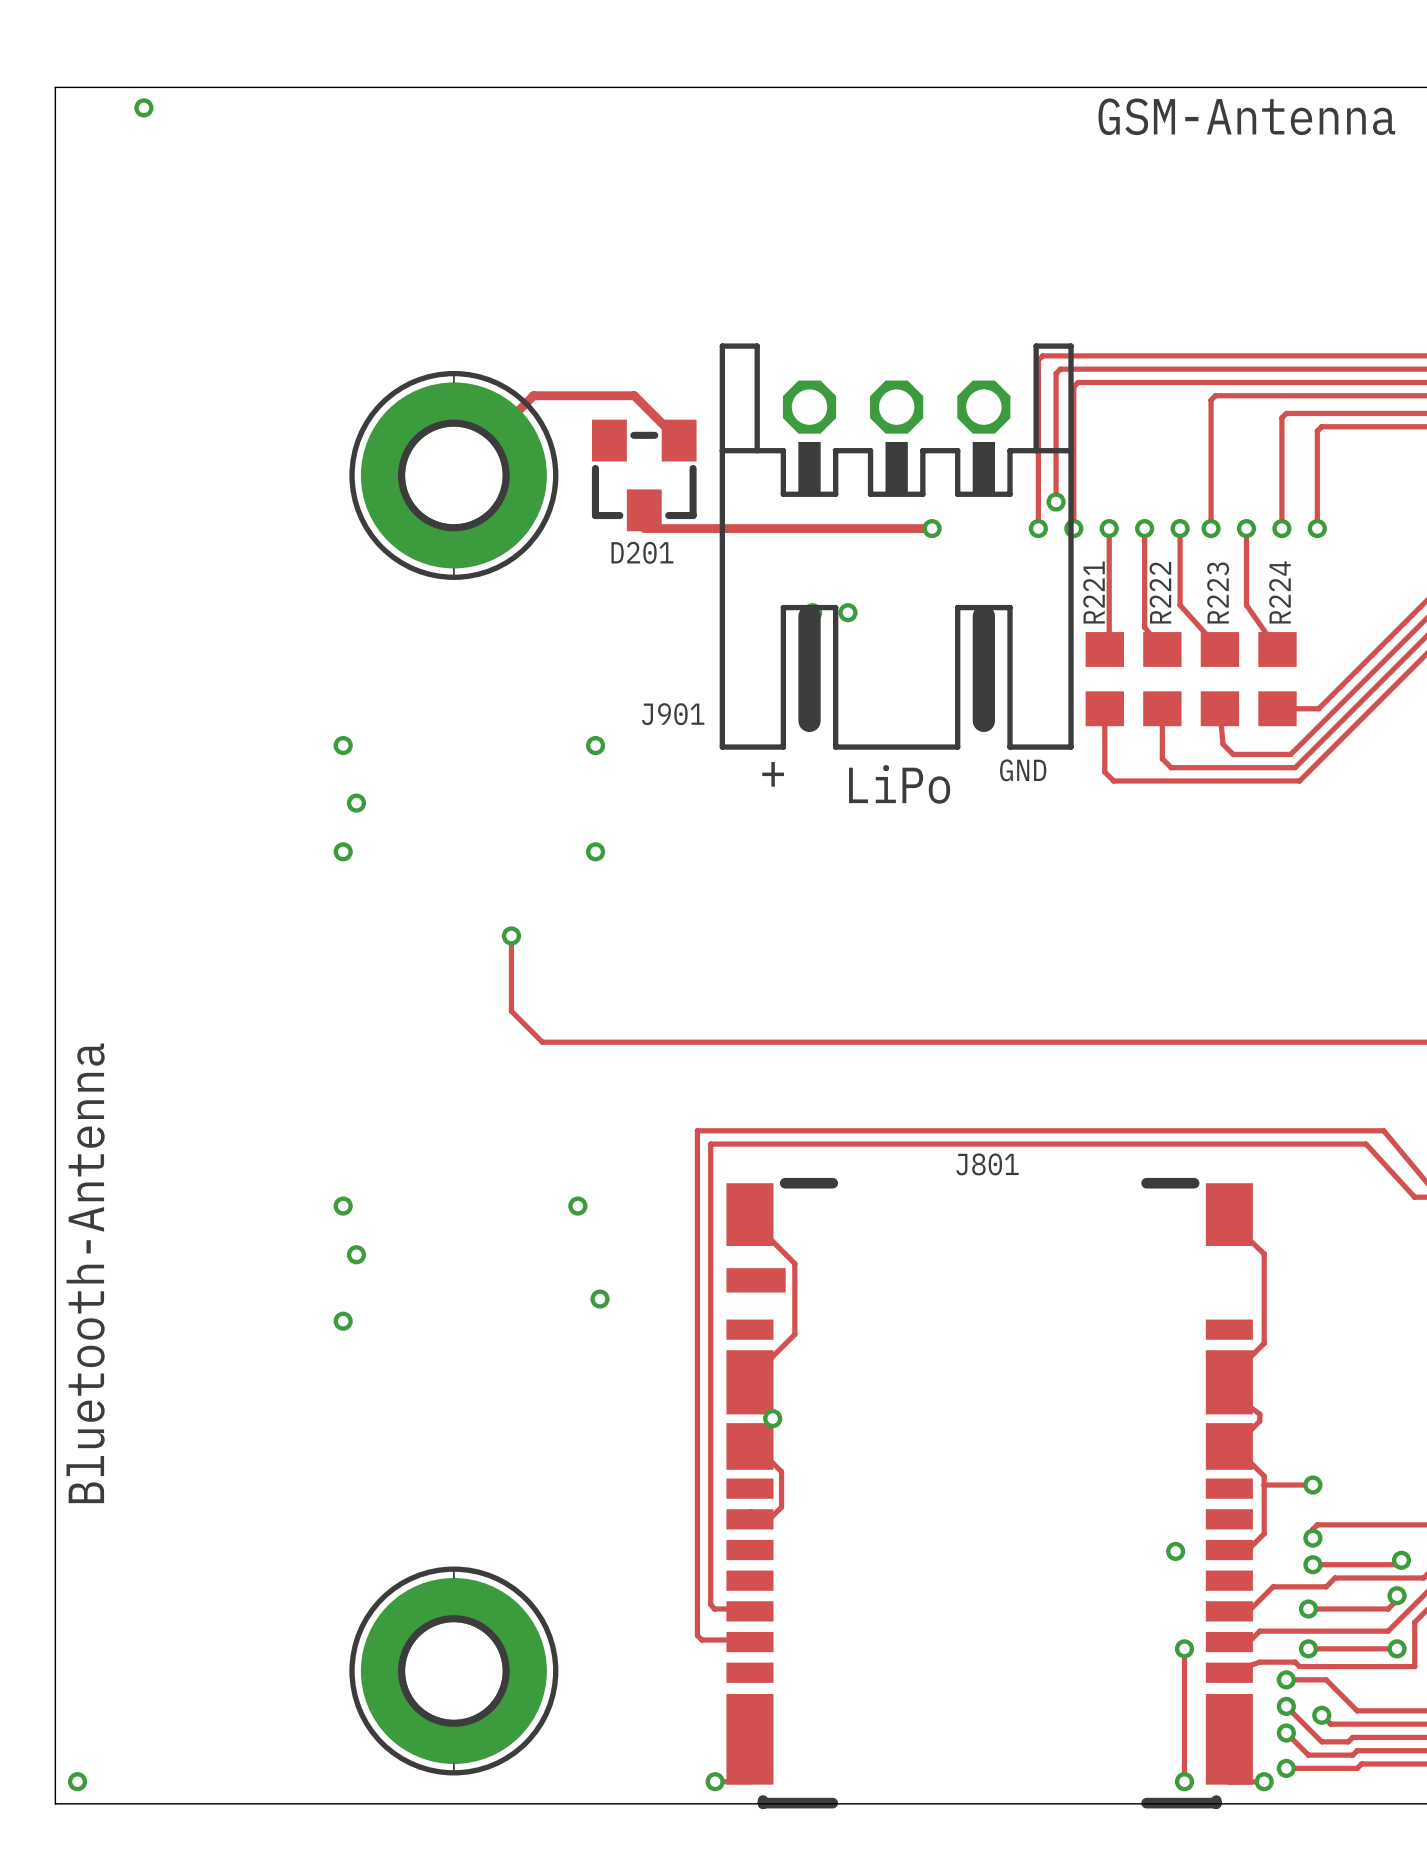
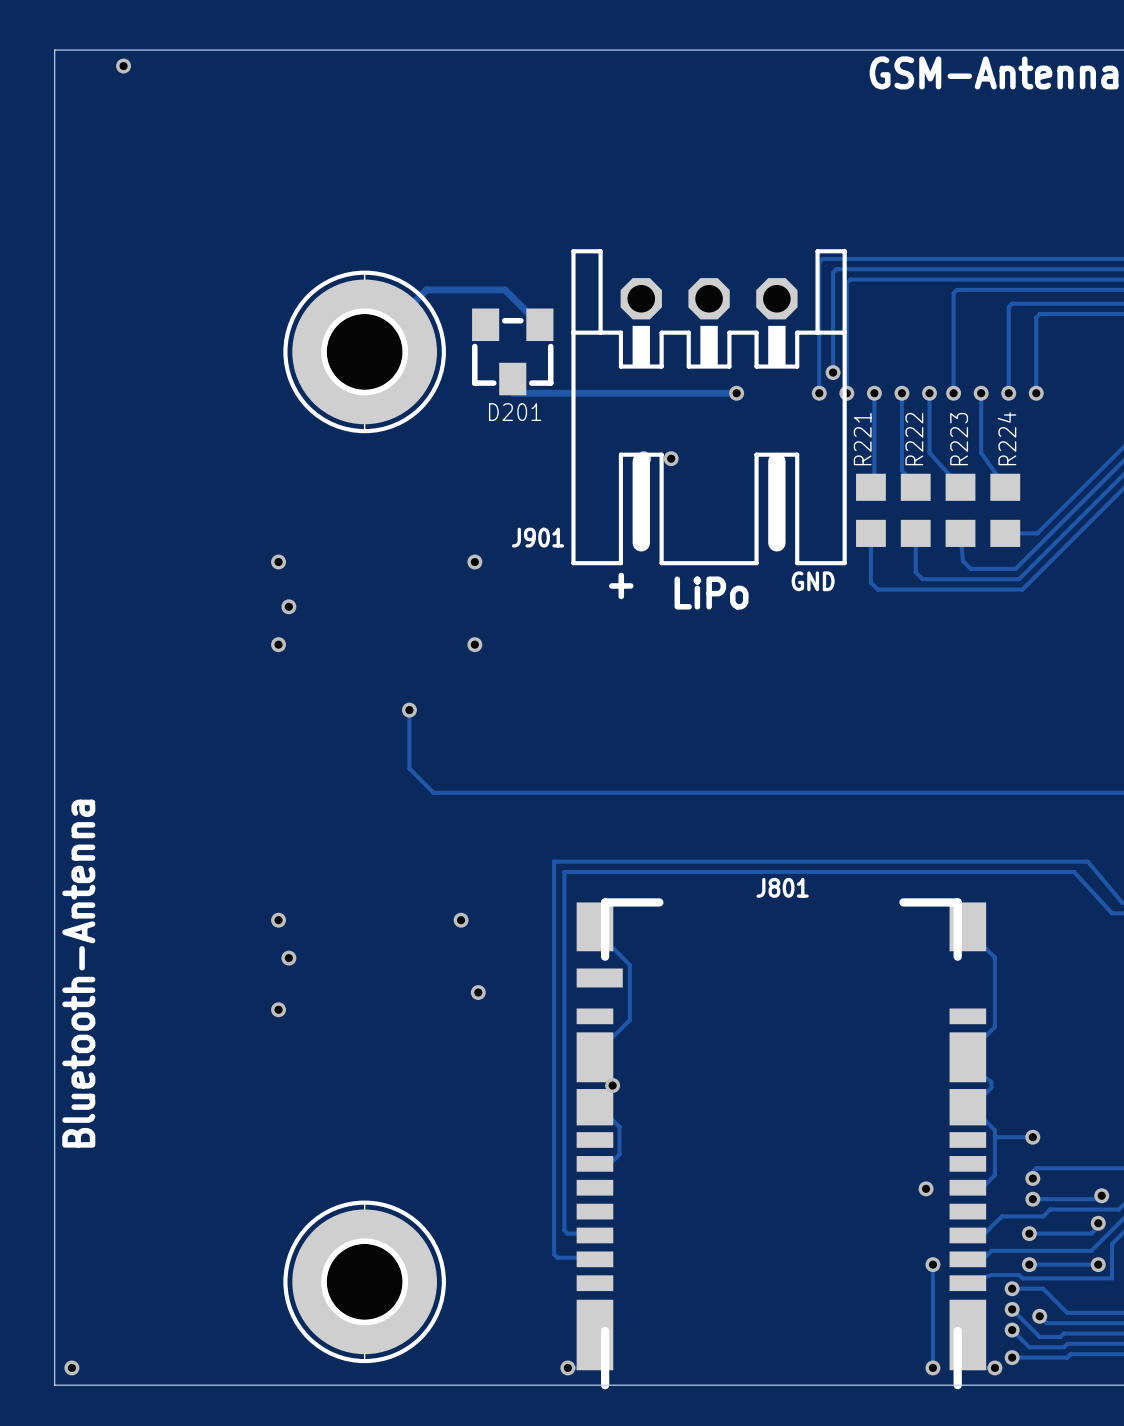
J801 footprint: [726, 1177, 1253, 1810] -> [576, 898, 987, 1390]

